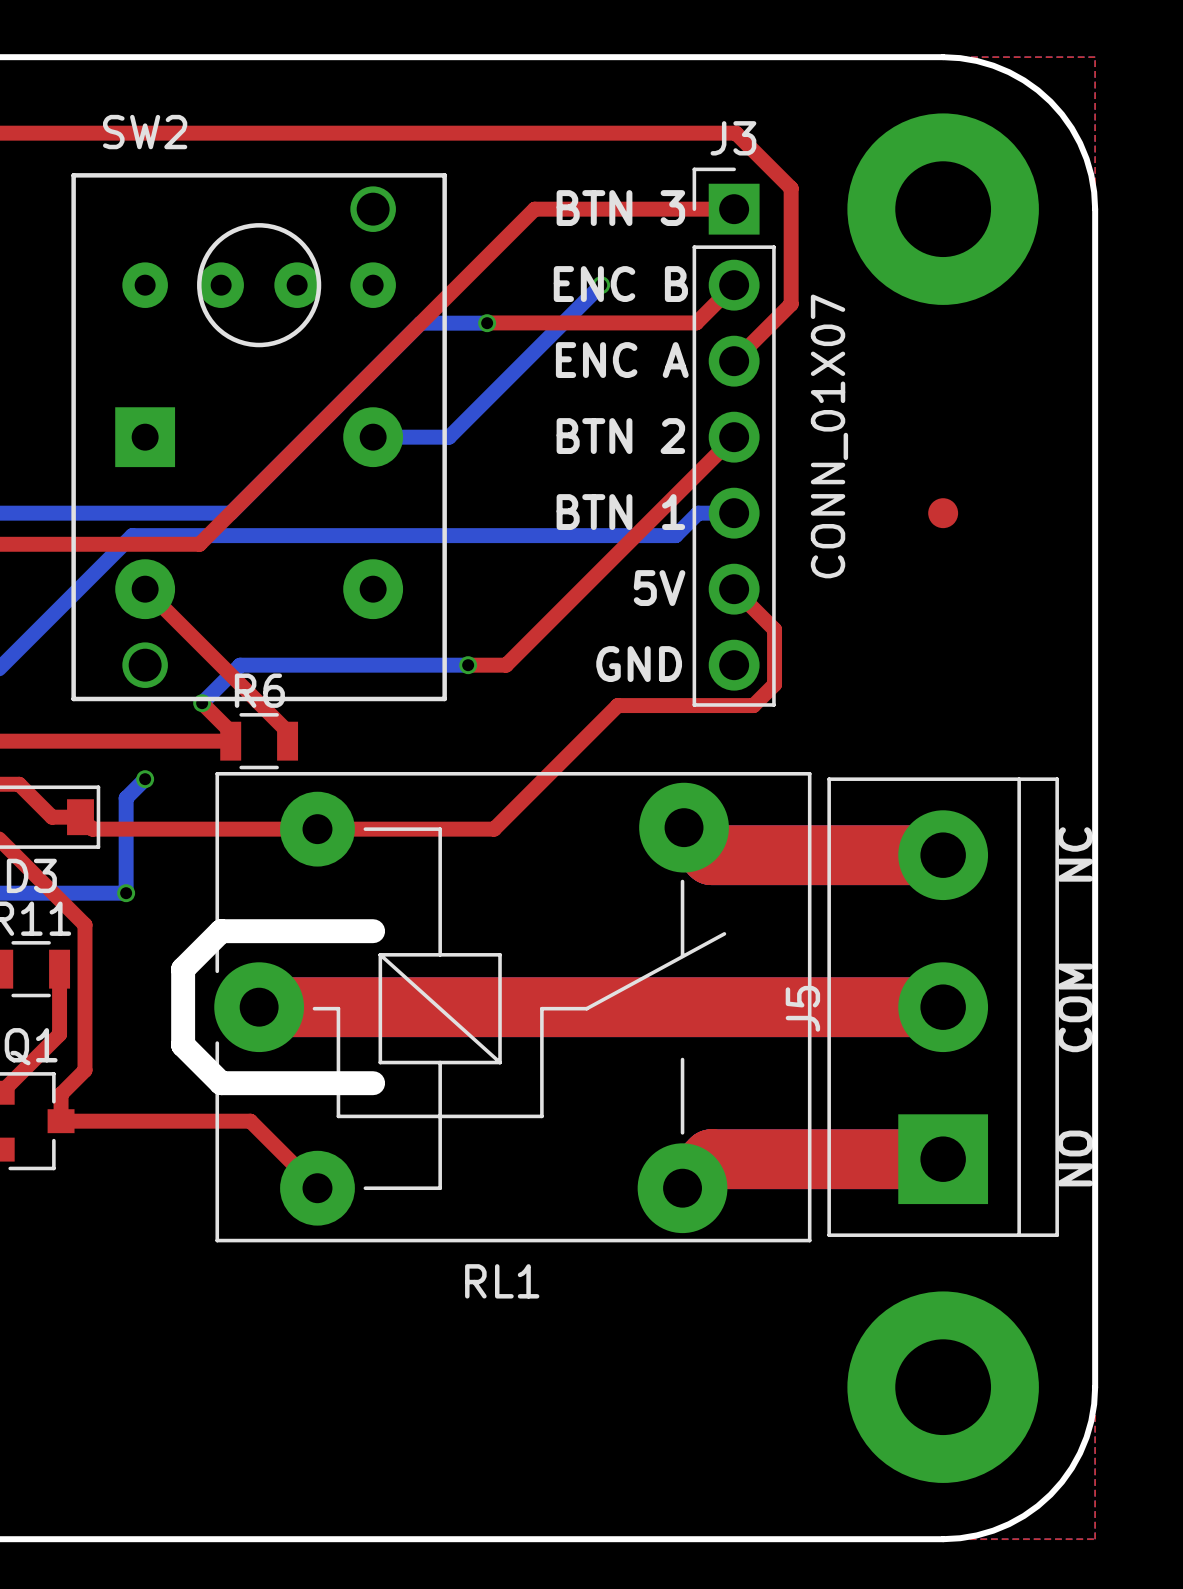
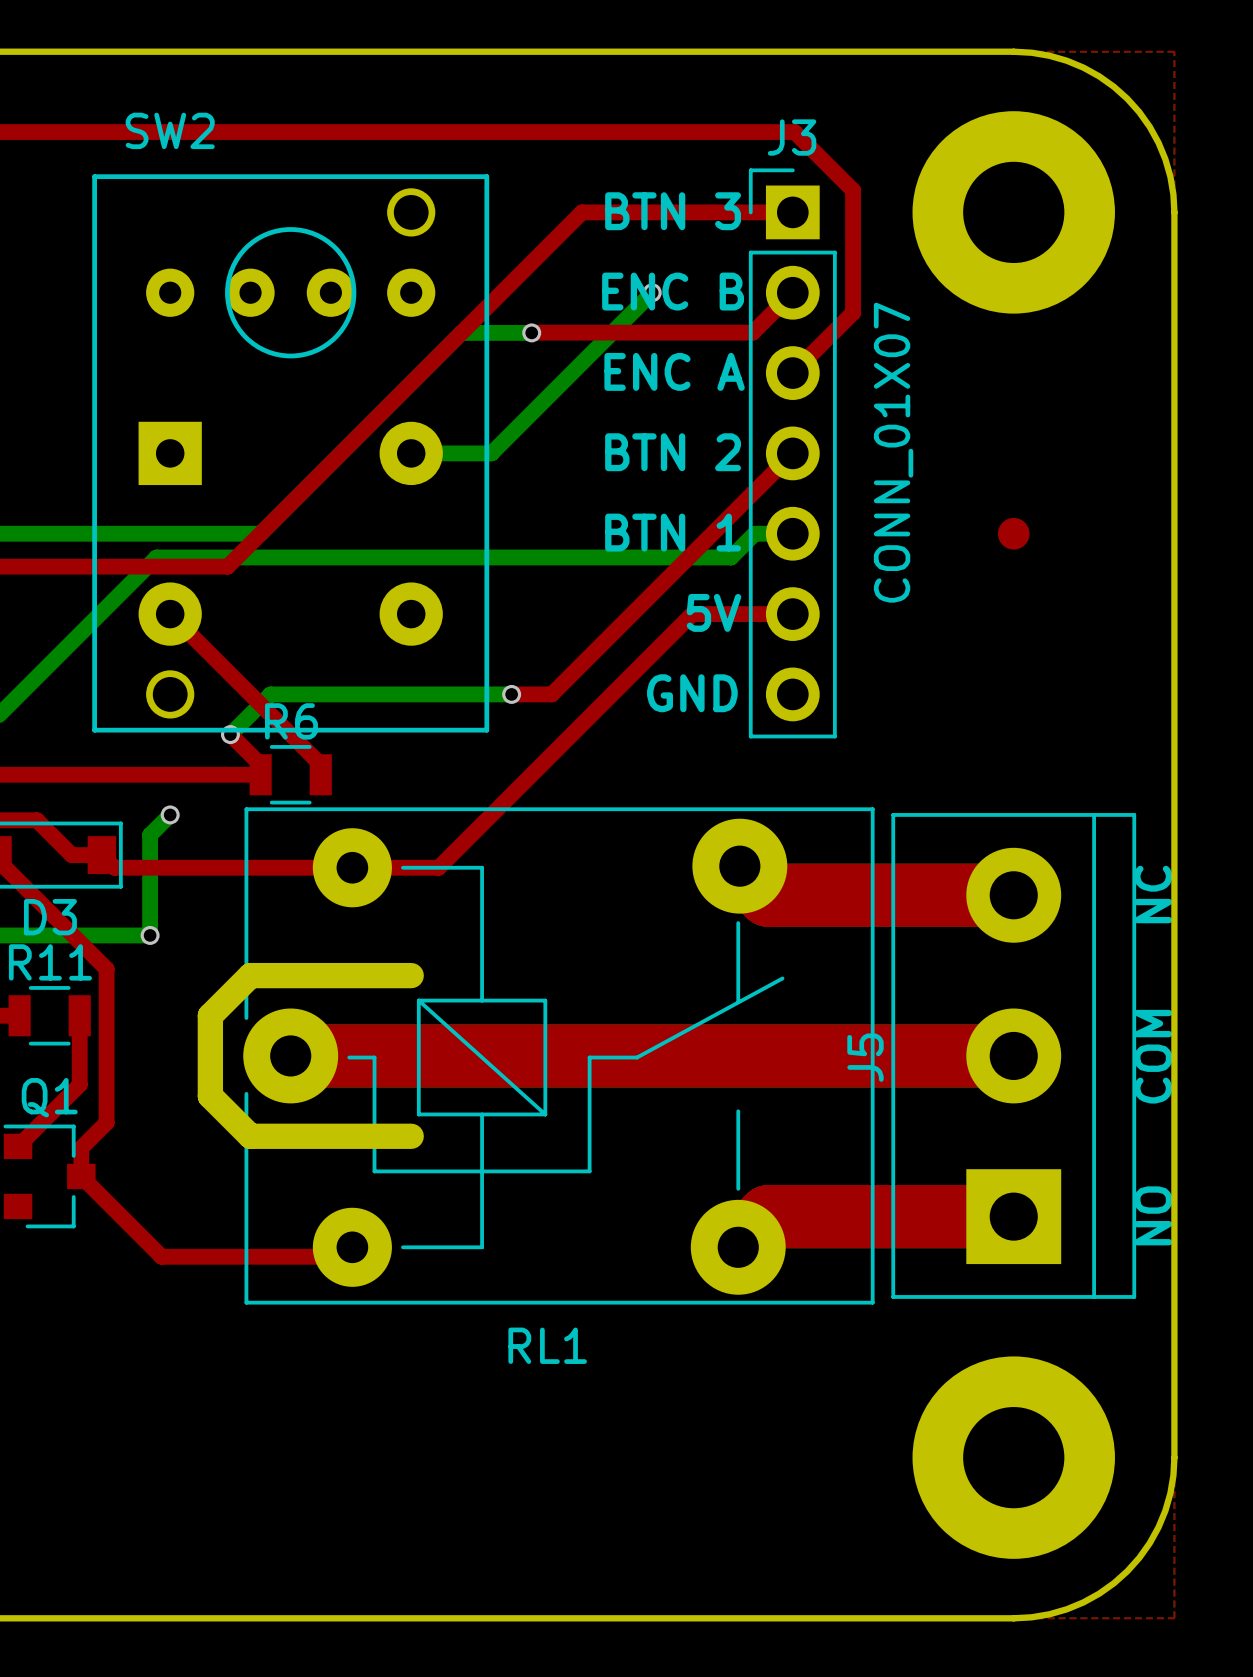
top track: (734, 589) (774, 629) (774, 684) (753, 705) (617, 705) (494, 829) (399, 829) -> (792, 614) (692, 614) (438, 867)
top track: (61, 1121) (250, 1121) (317, 1188) -> (81, 1176) (161, 1256) (342, 1256) (352, 1247)

